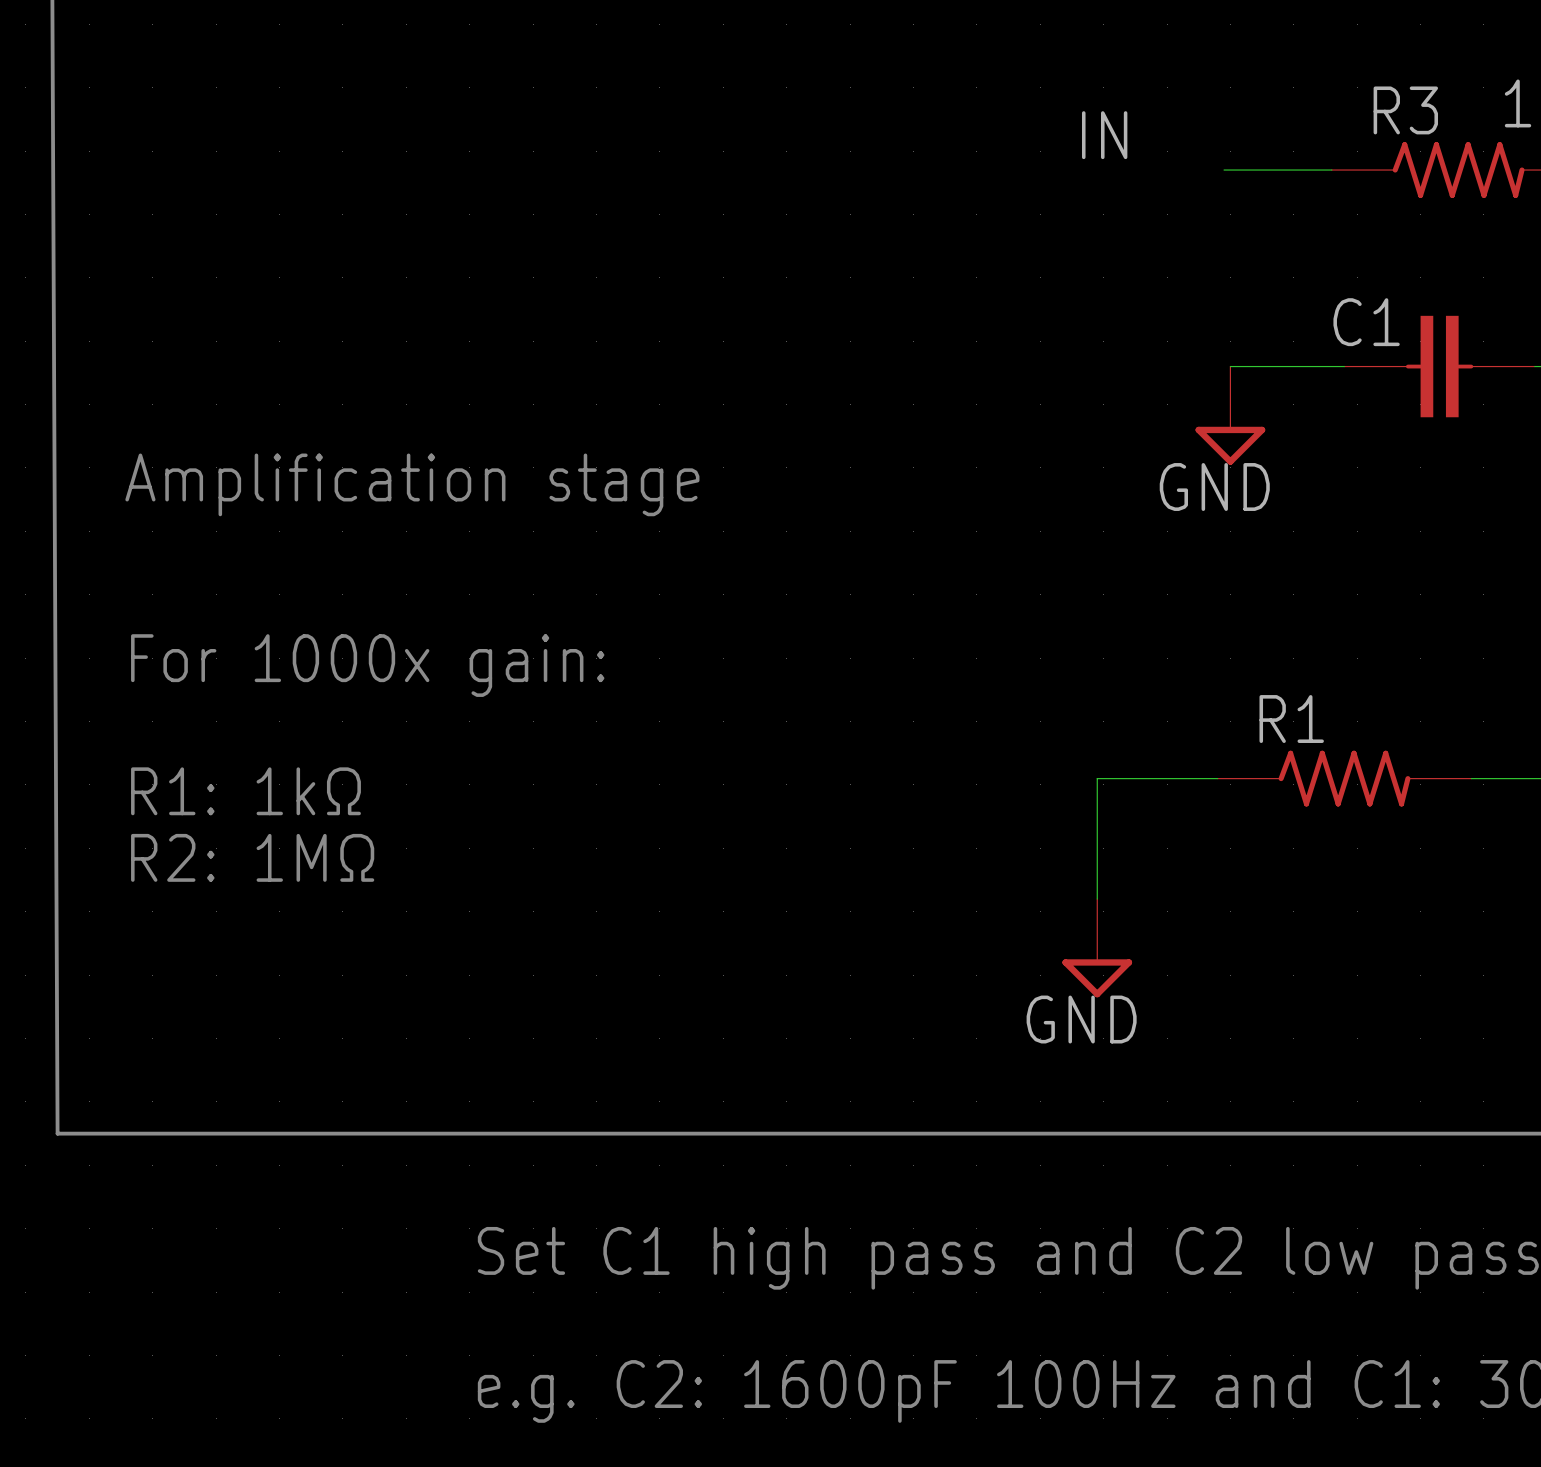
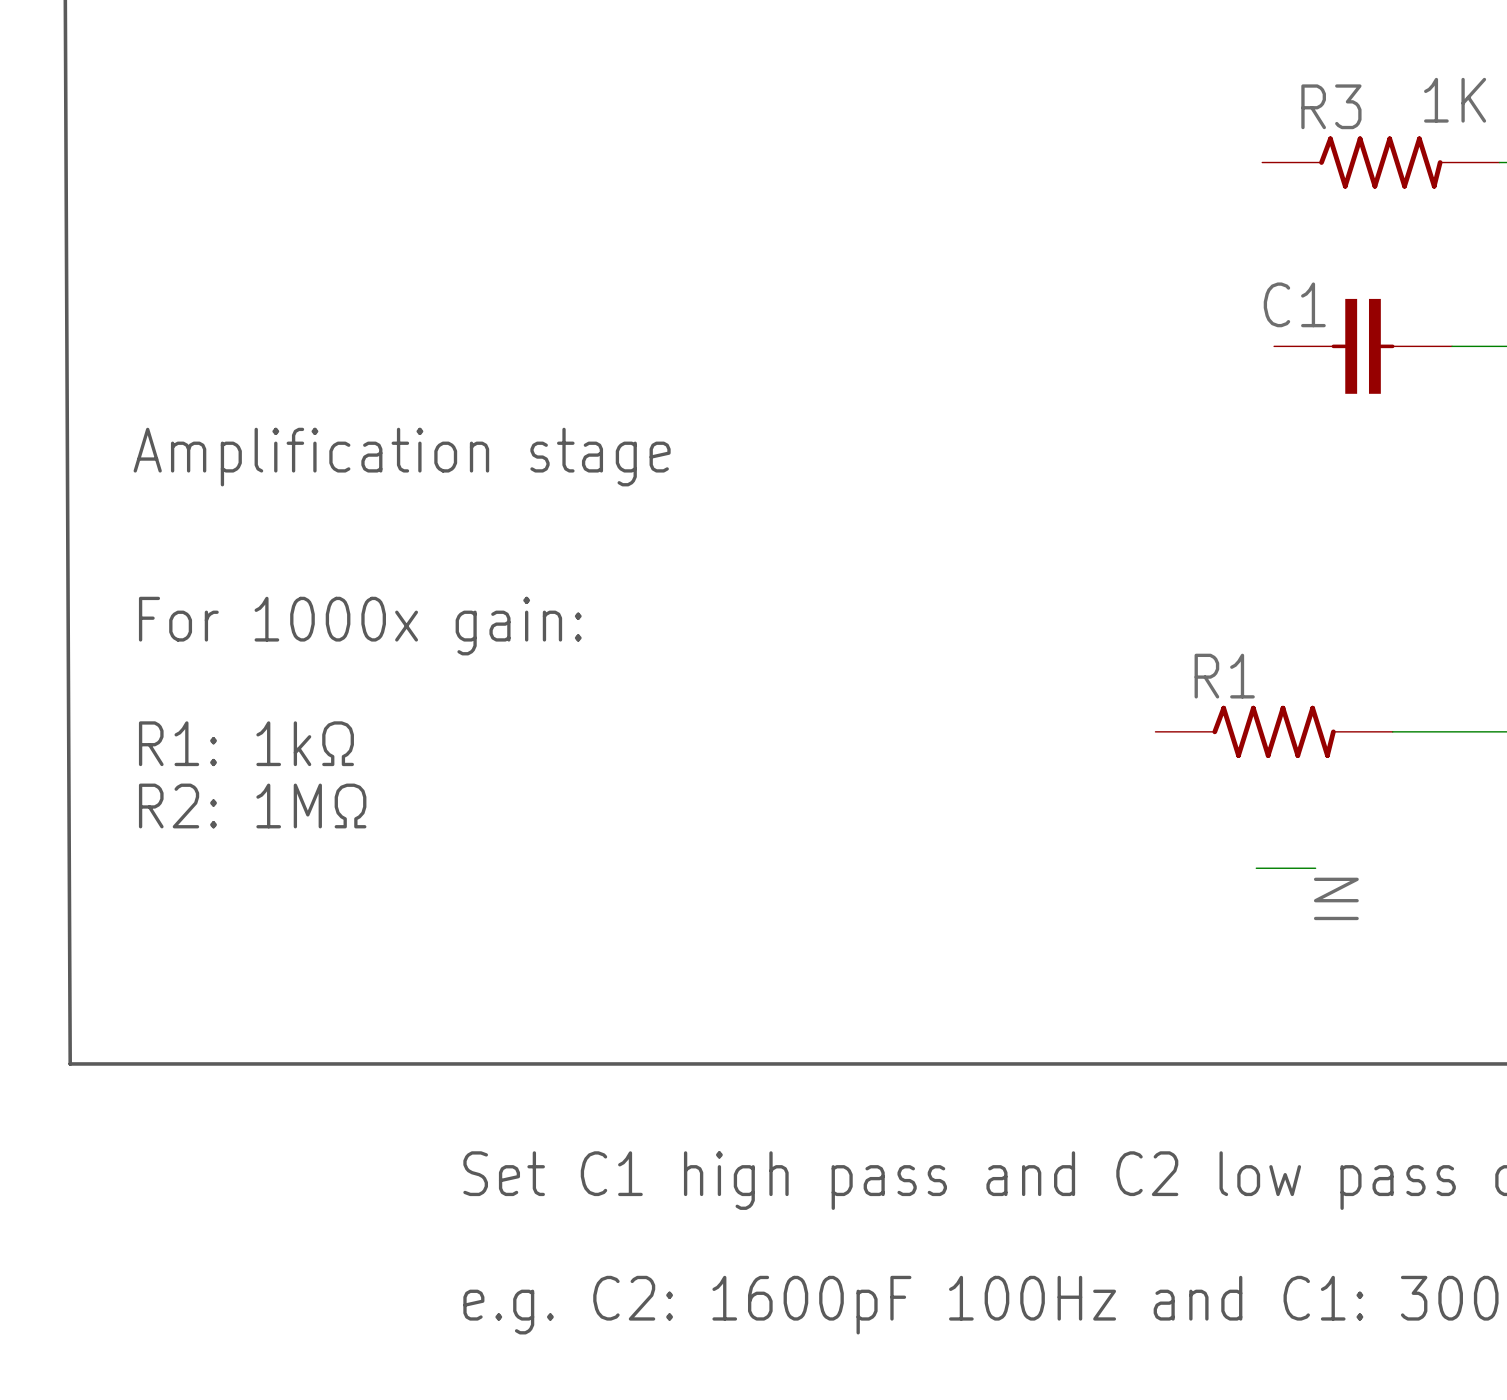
label: IN (1104, 135) -> none
wire: (1224, 170) (1331, 170) -> none
wire: (1230, 366) (1344, 366) -> none
power symbol: GND (1230, 415) -> none
wire: (1217, 778) (1097, 778) (1097, 899) -> none
wire: none -> (1256, 868) (1315, 868)
power symbol: GND (1097, 948) -> none
label: none -> IN (1336, 898)

